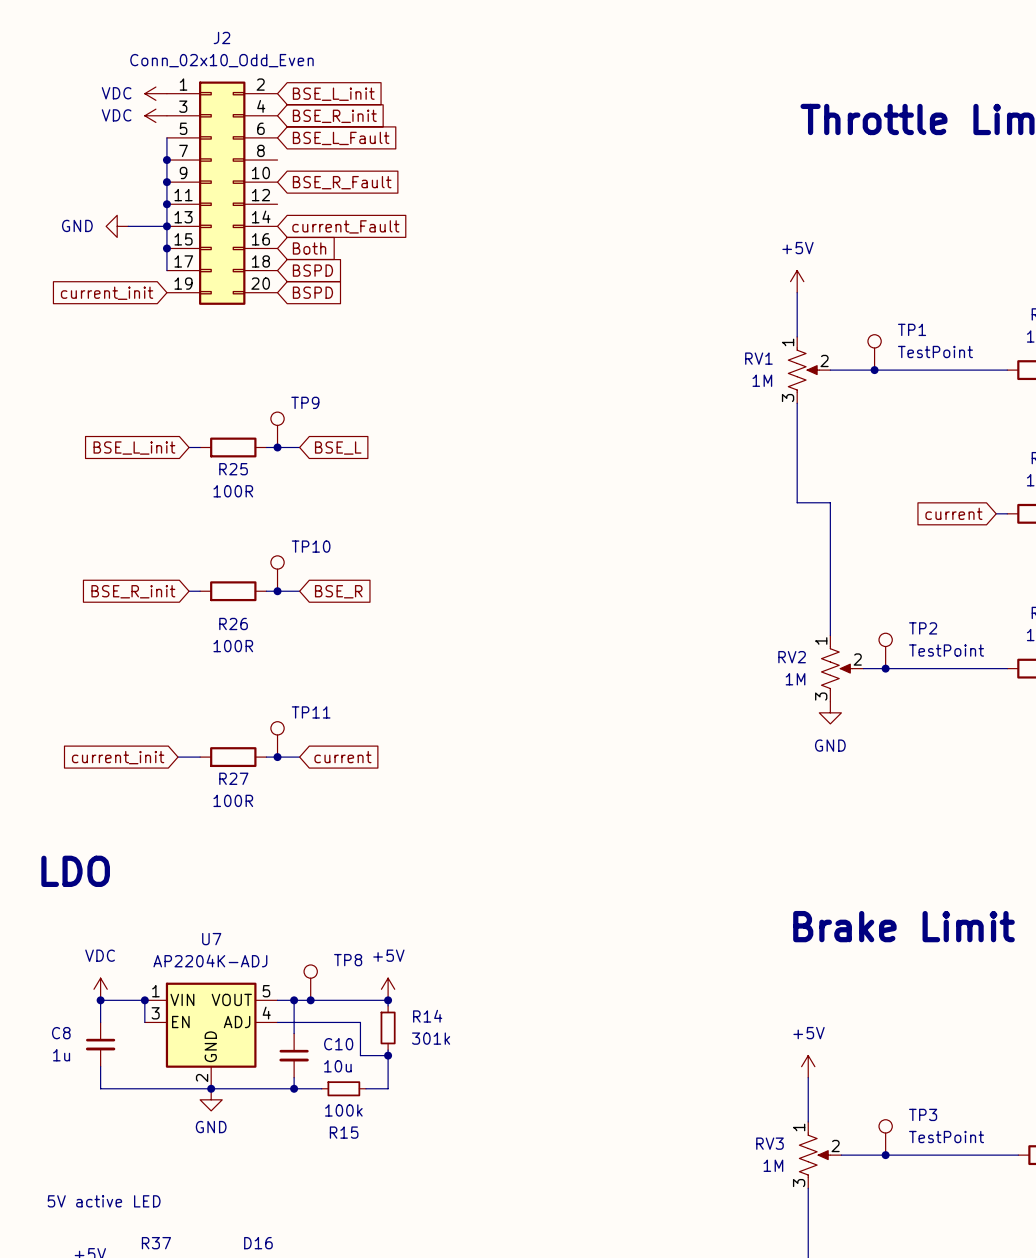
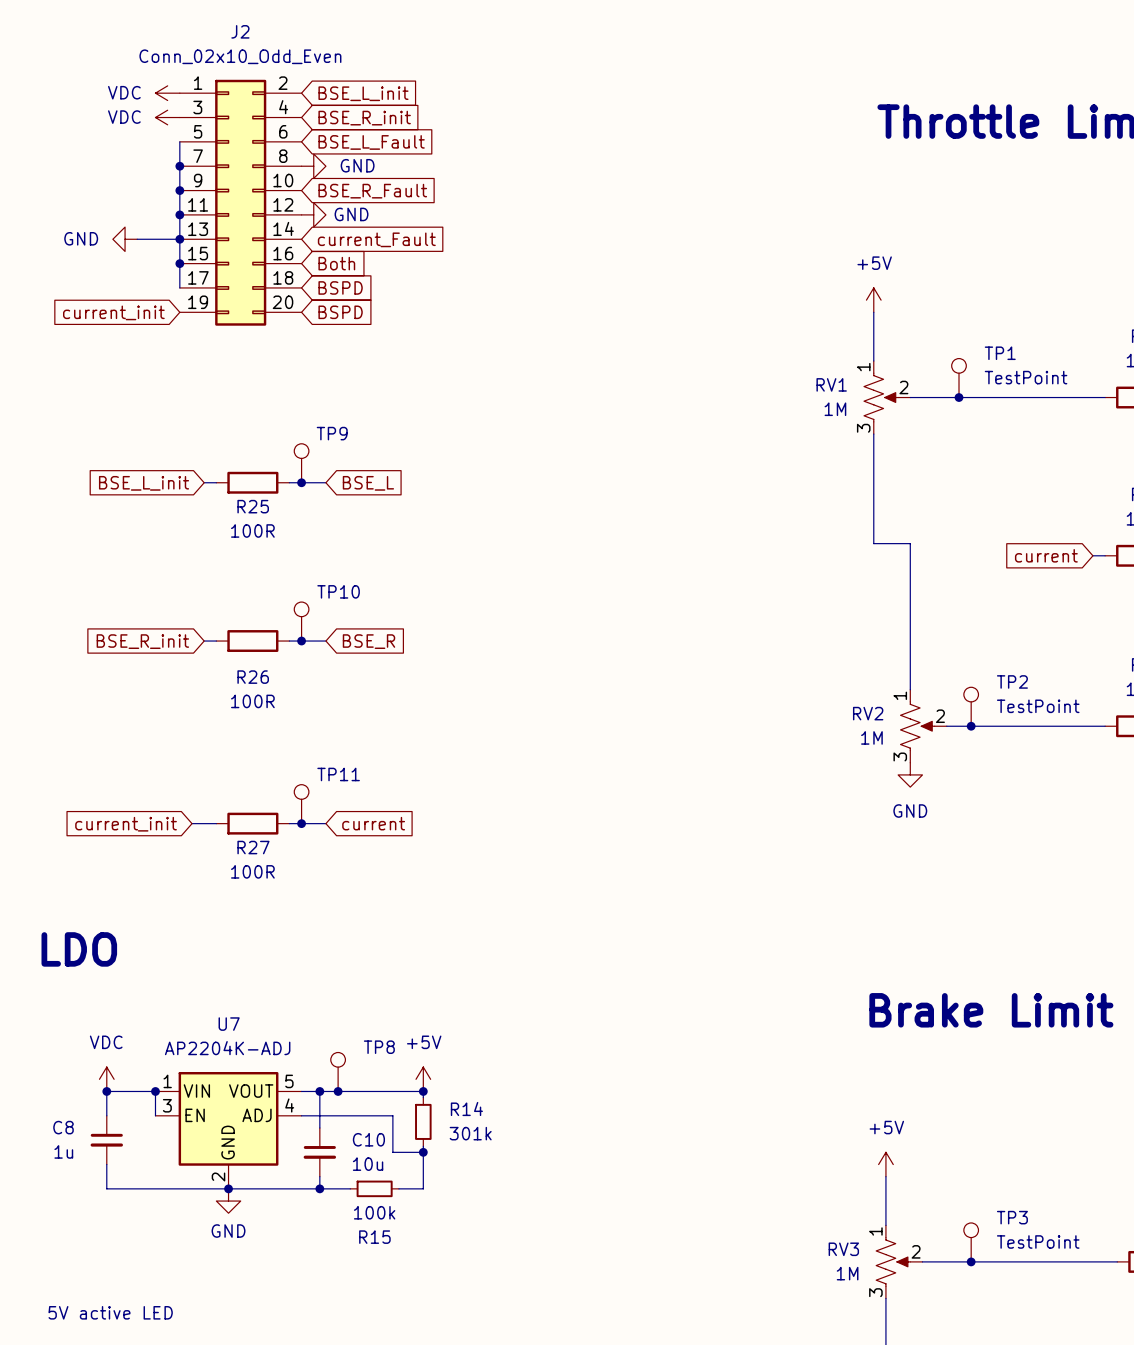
power symbol: none -> GND (313, 166)
power symbol: none -> GND (313, 214)

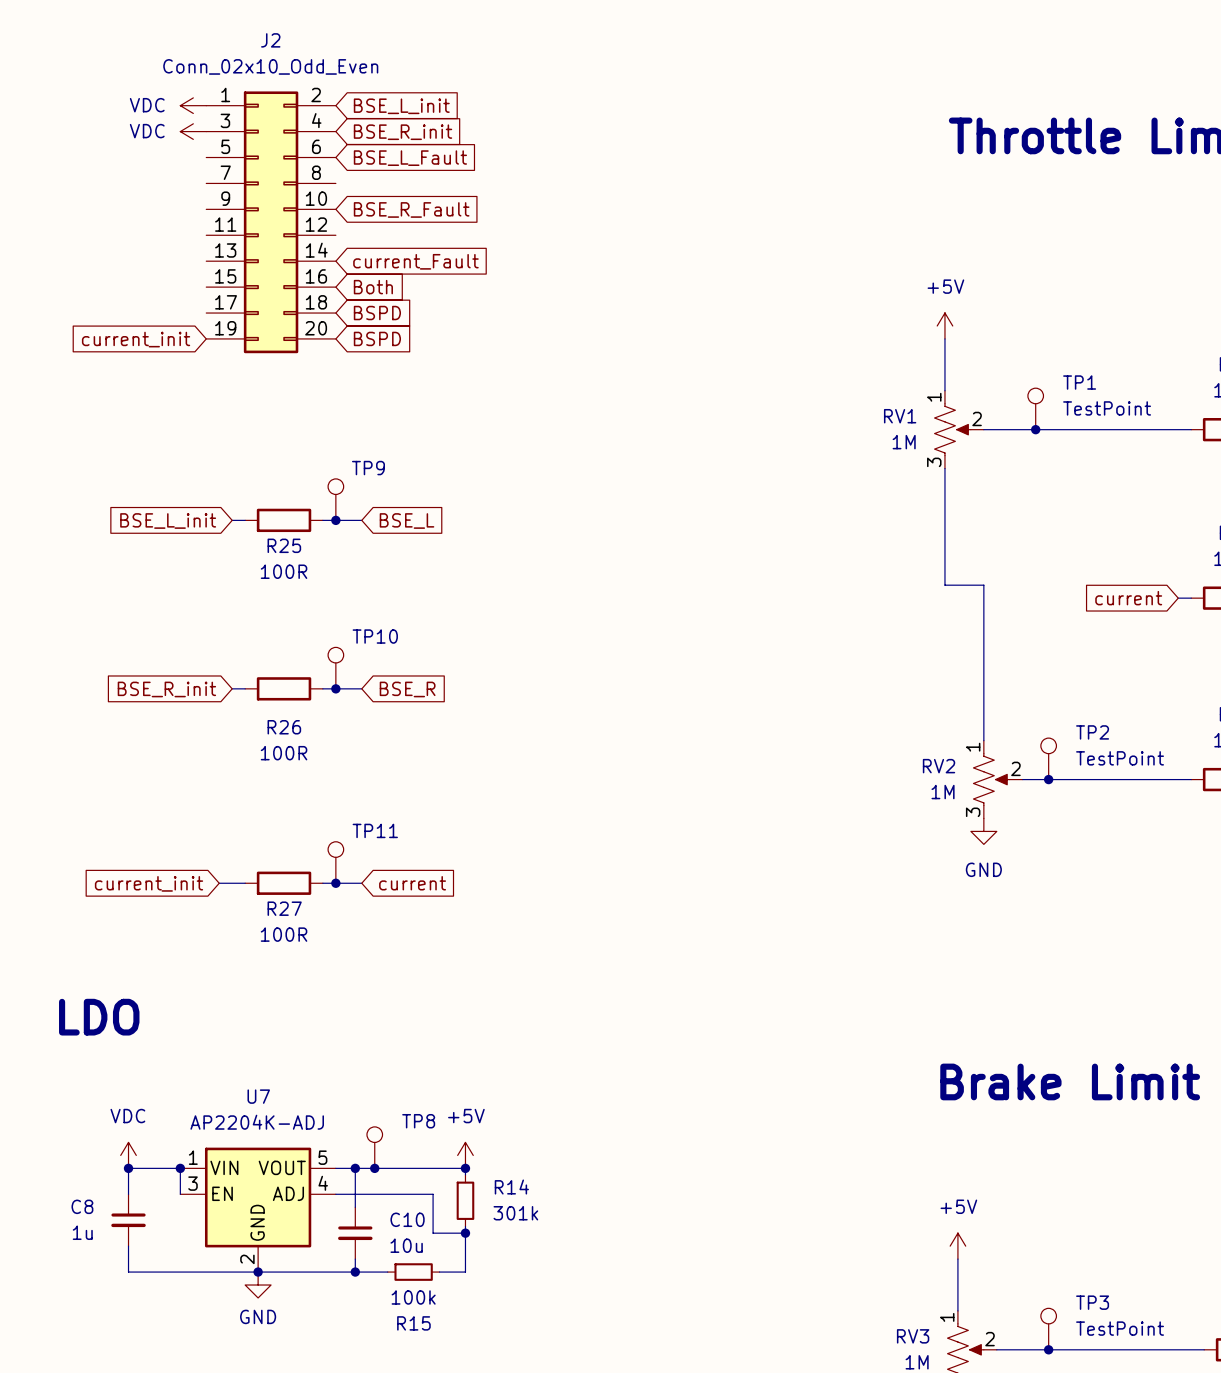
wire: (179, 141) (179, 287) -> none
junction: (179, 166) -> none
power symbol: GND (313, 166) -> none
junction: (179, 190) -> none
junction: (179, 214) -> none
power symbol: GND (313, 214) -> none
power symbol: GND (125, 239) -> none
wire: (137, 239) (179, 239) -> none
junction: (179, 239) -> none
junction: (179, 263) -> none

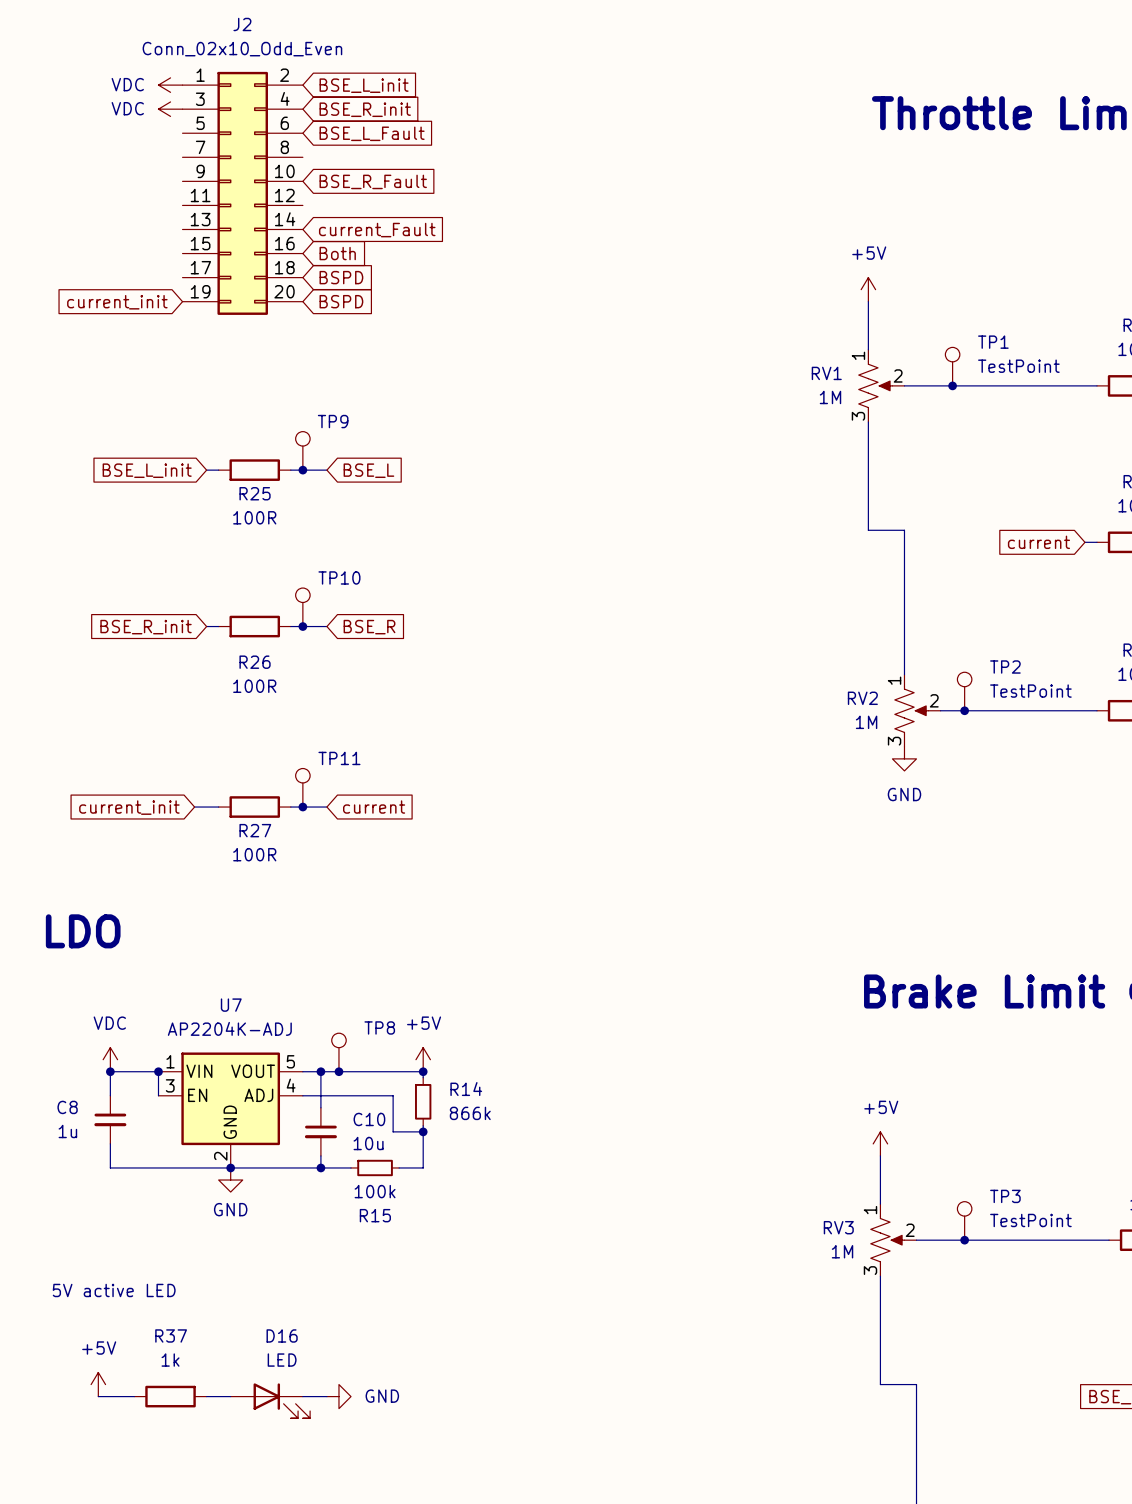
R14 value: 301k (515, 1213) -> 866k (470, 1113)

